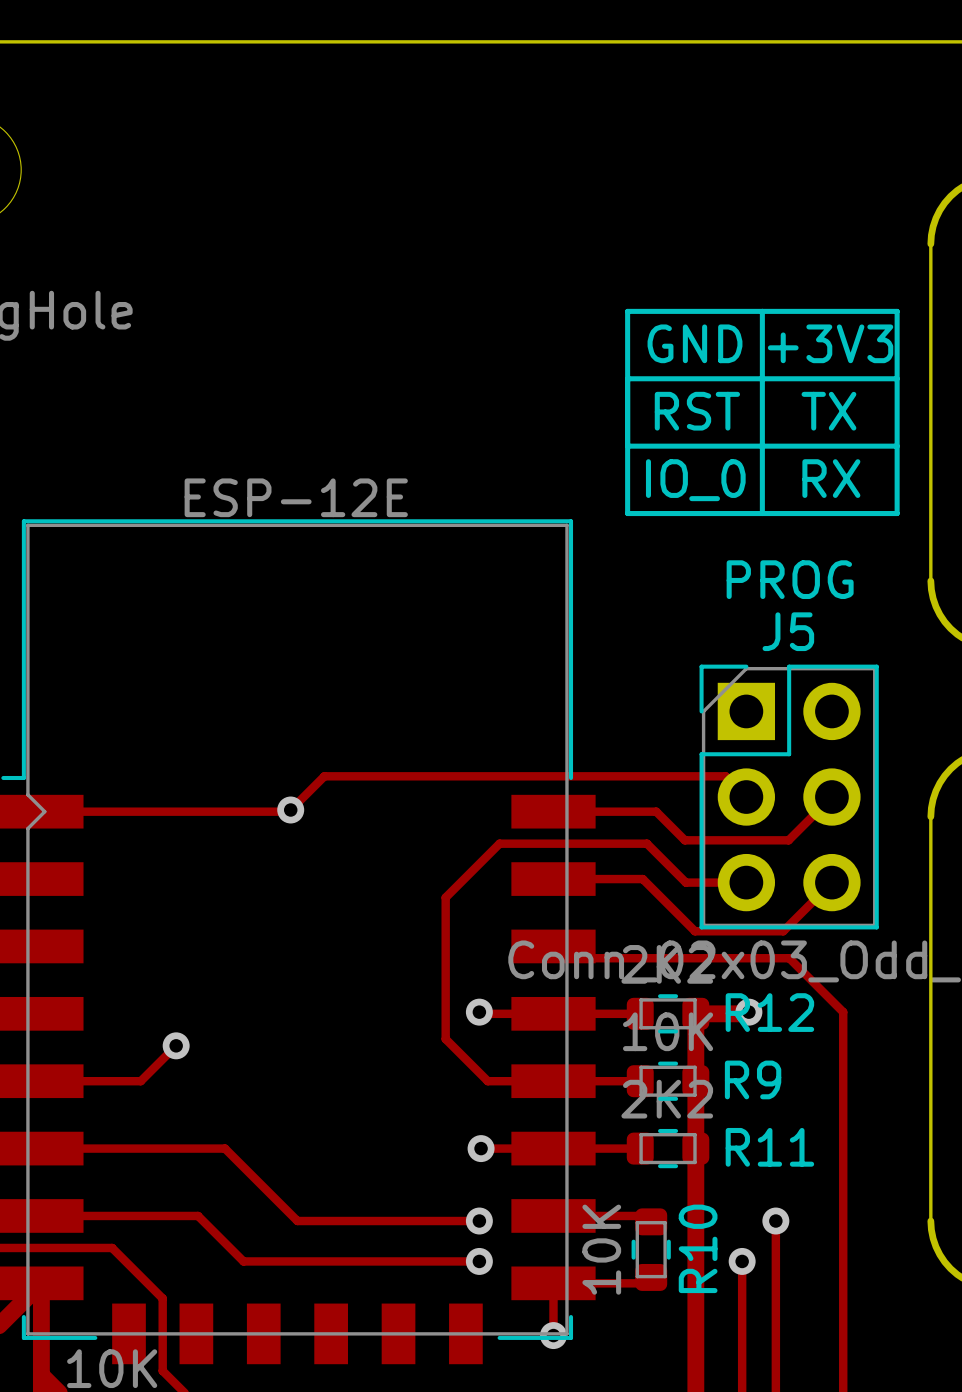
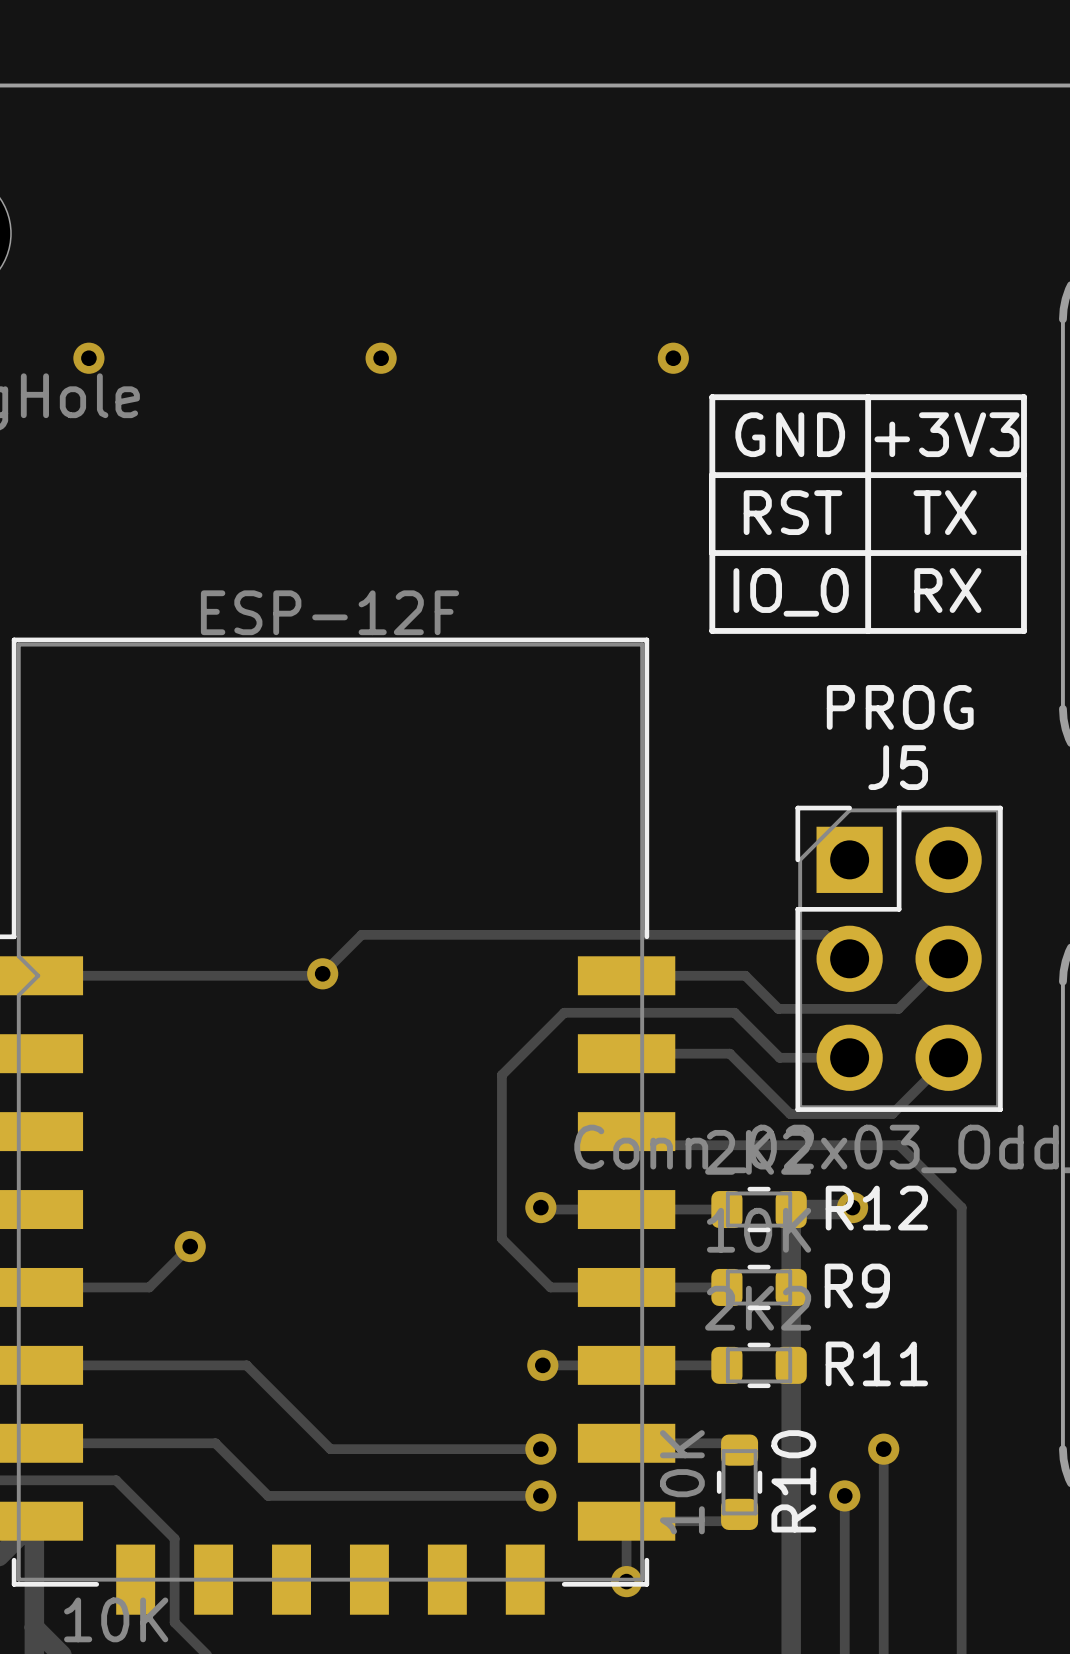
via: none -> (88, 358)
via: none -> (381, 358)
via: none -> (673, 358)
part value: ESP-12E (296, 497) -> ESP-12F (329, 612)

